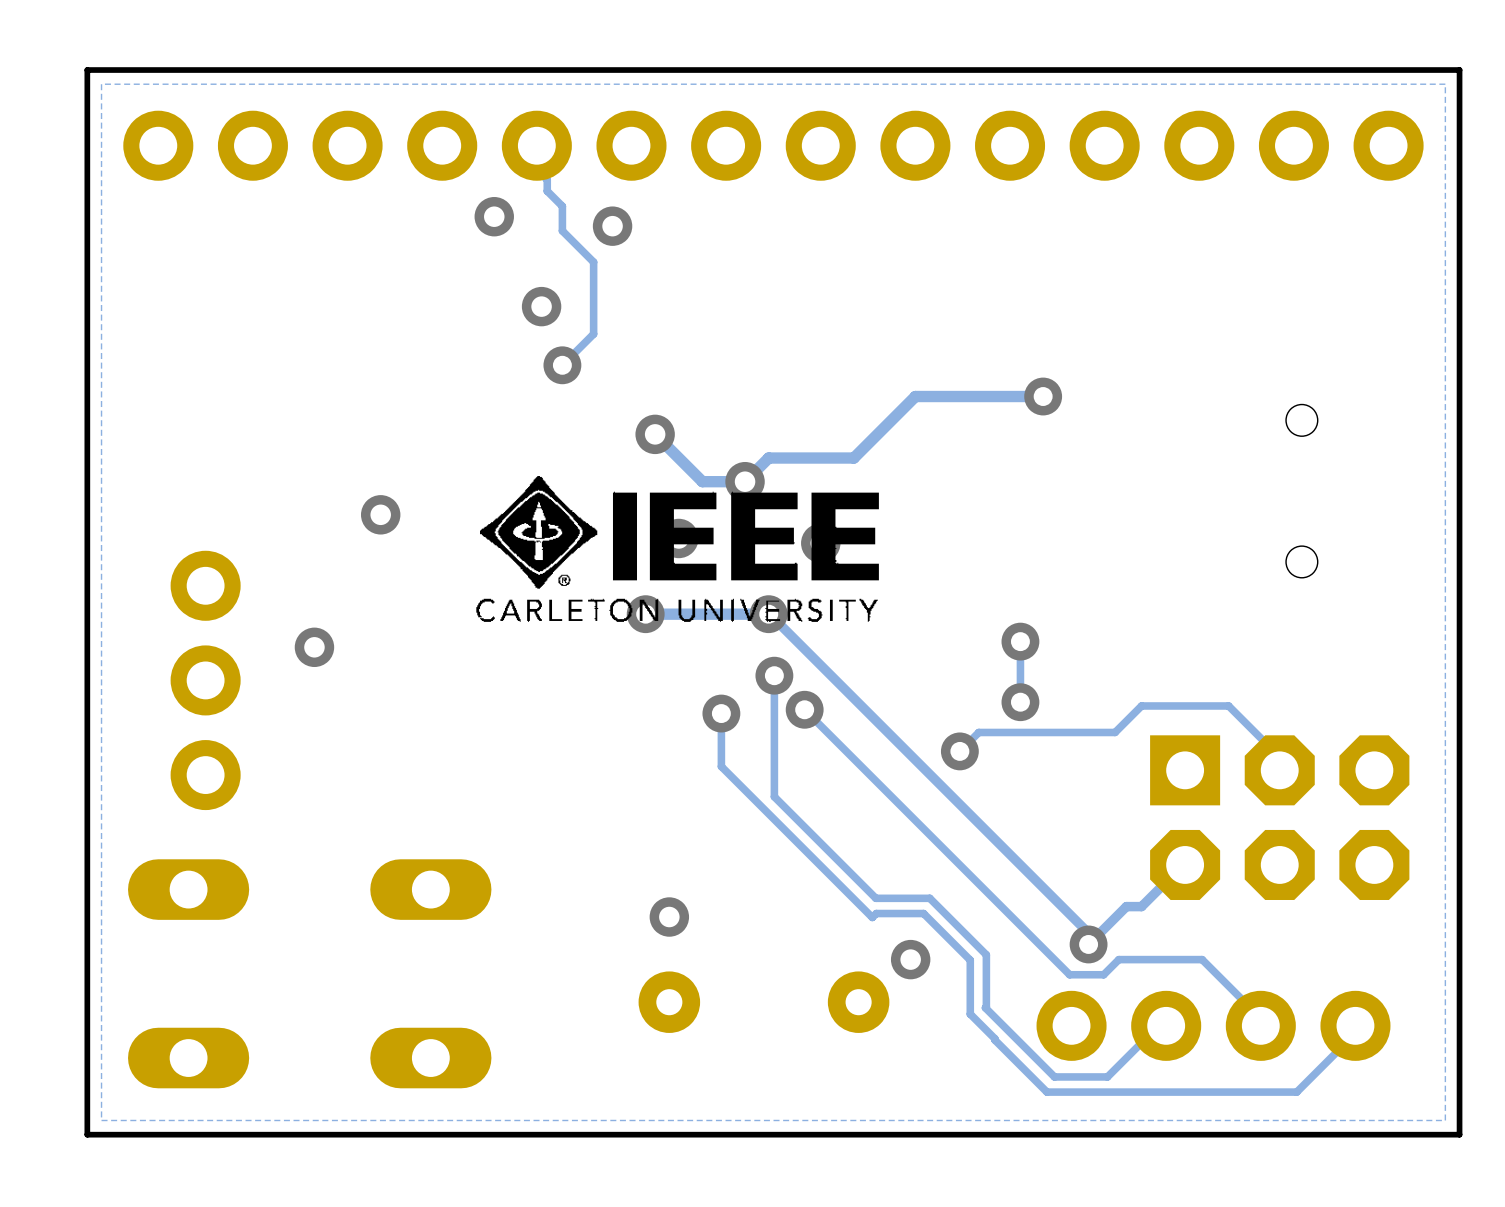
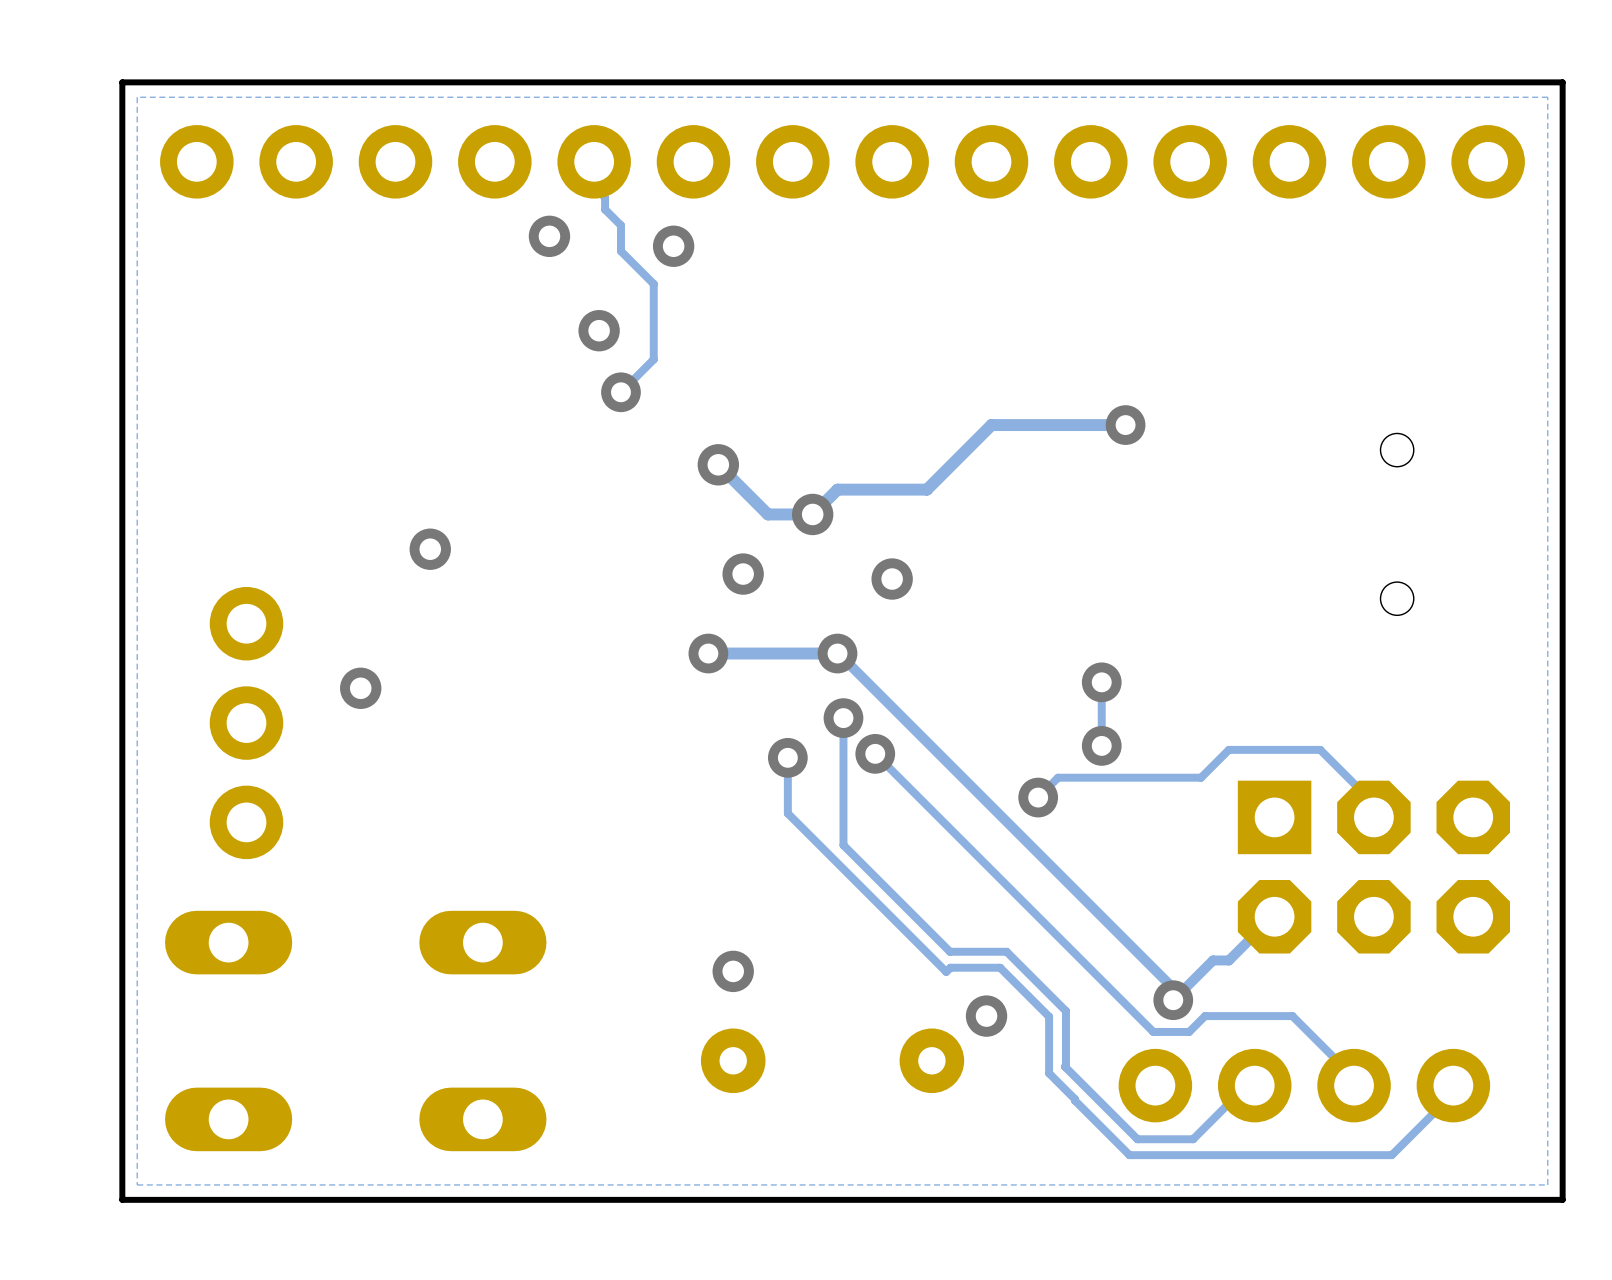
drawing: [476, 476, 879, 622] -> none

